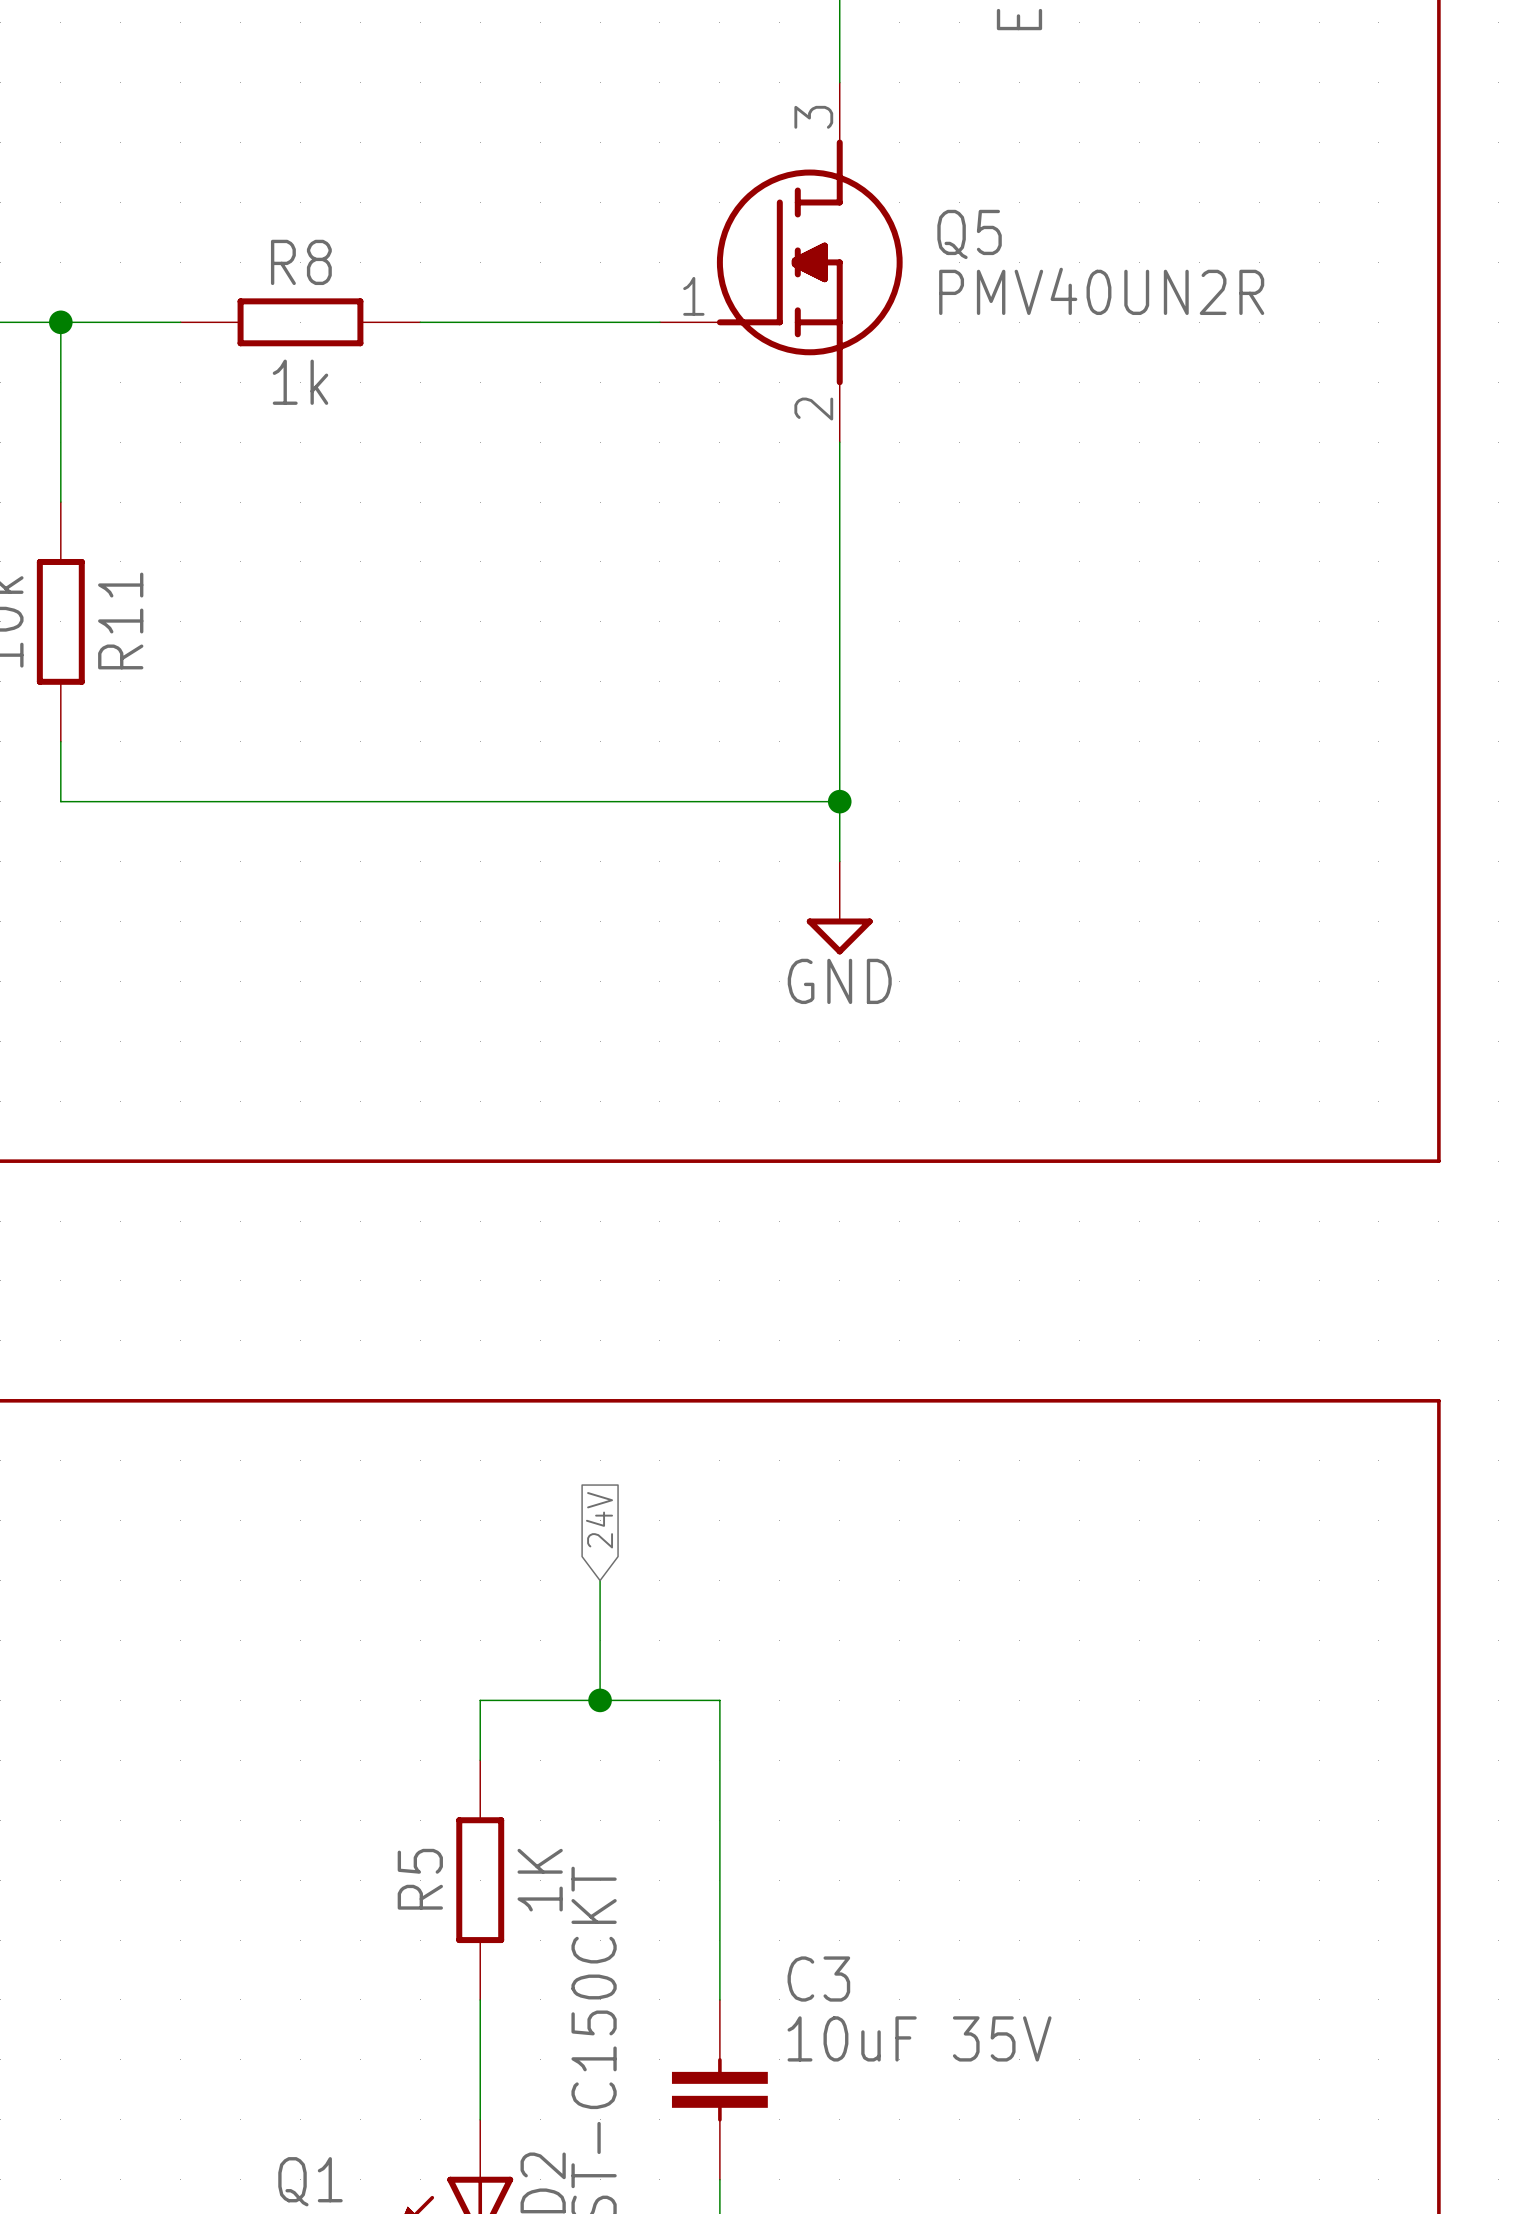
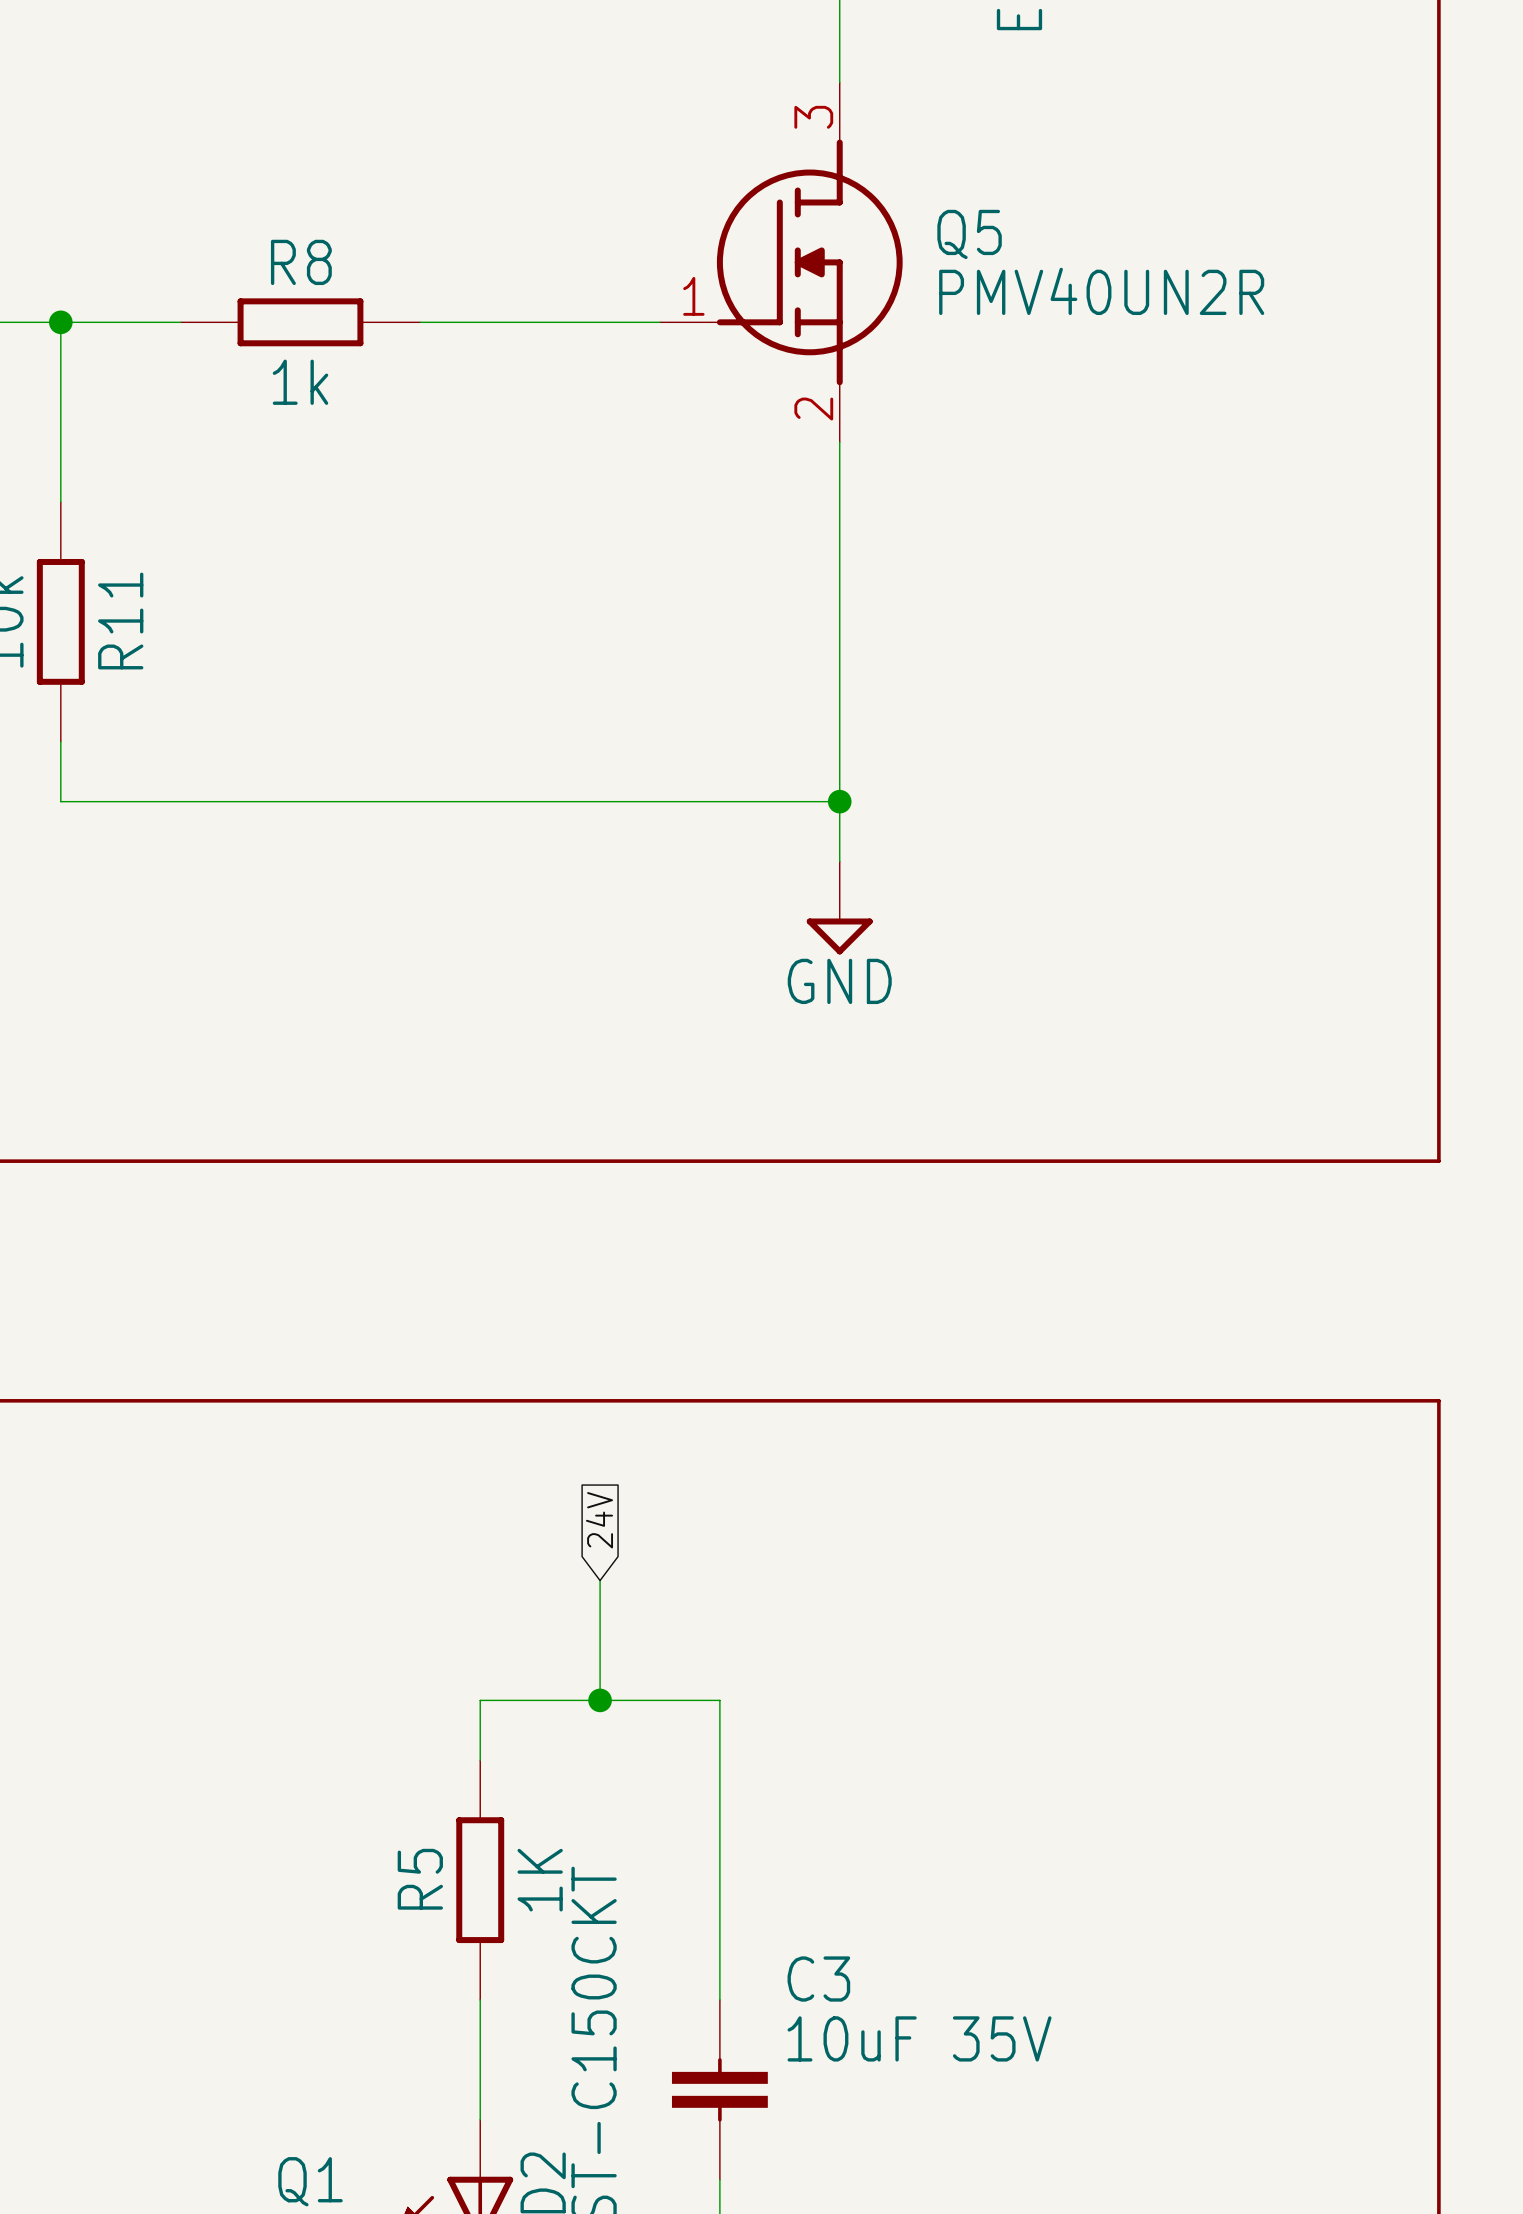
Q5 symbol: [659, 82, 903, 443] -> [659, 82, 903, 443]

